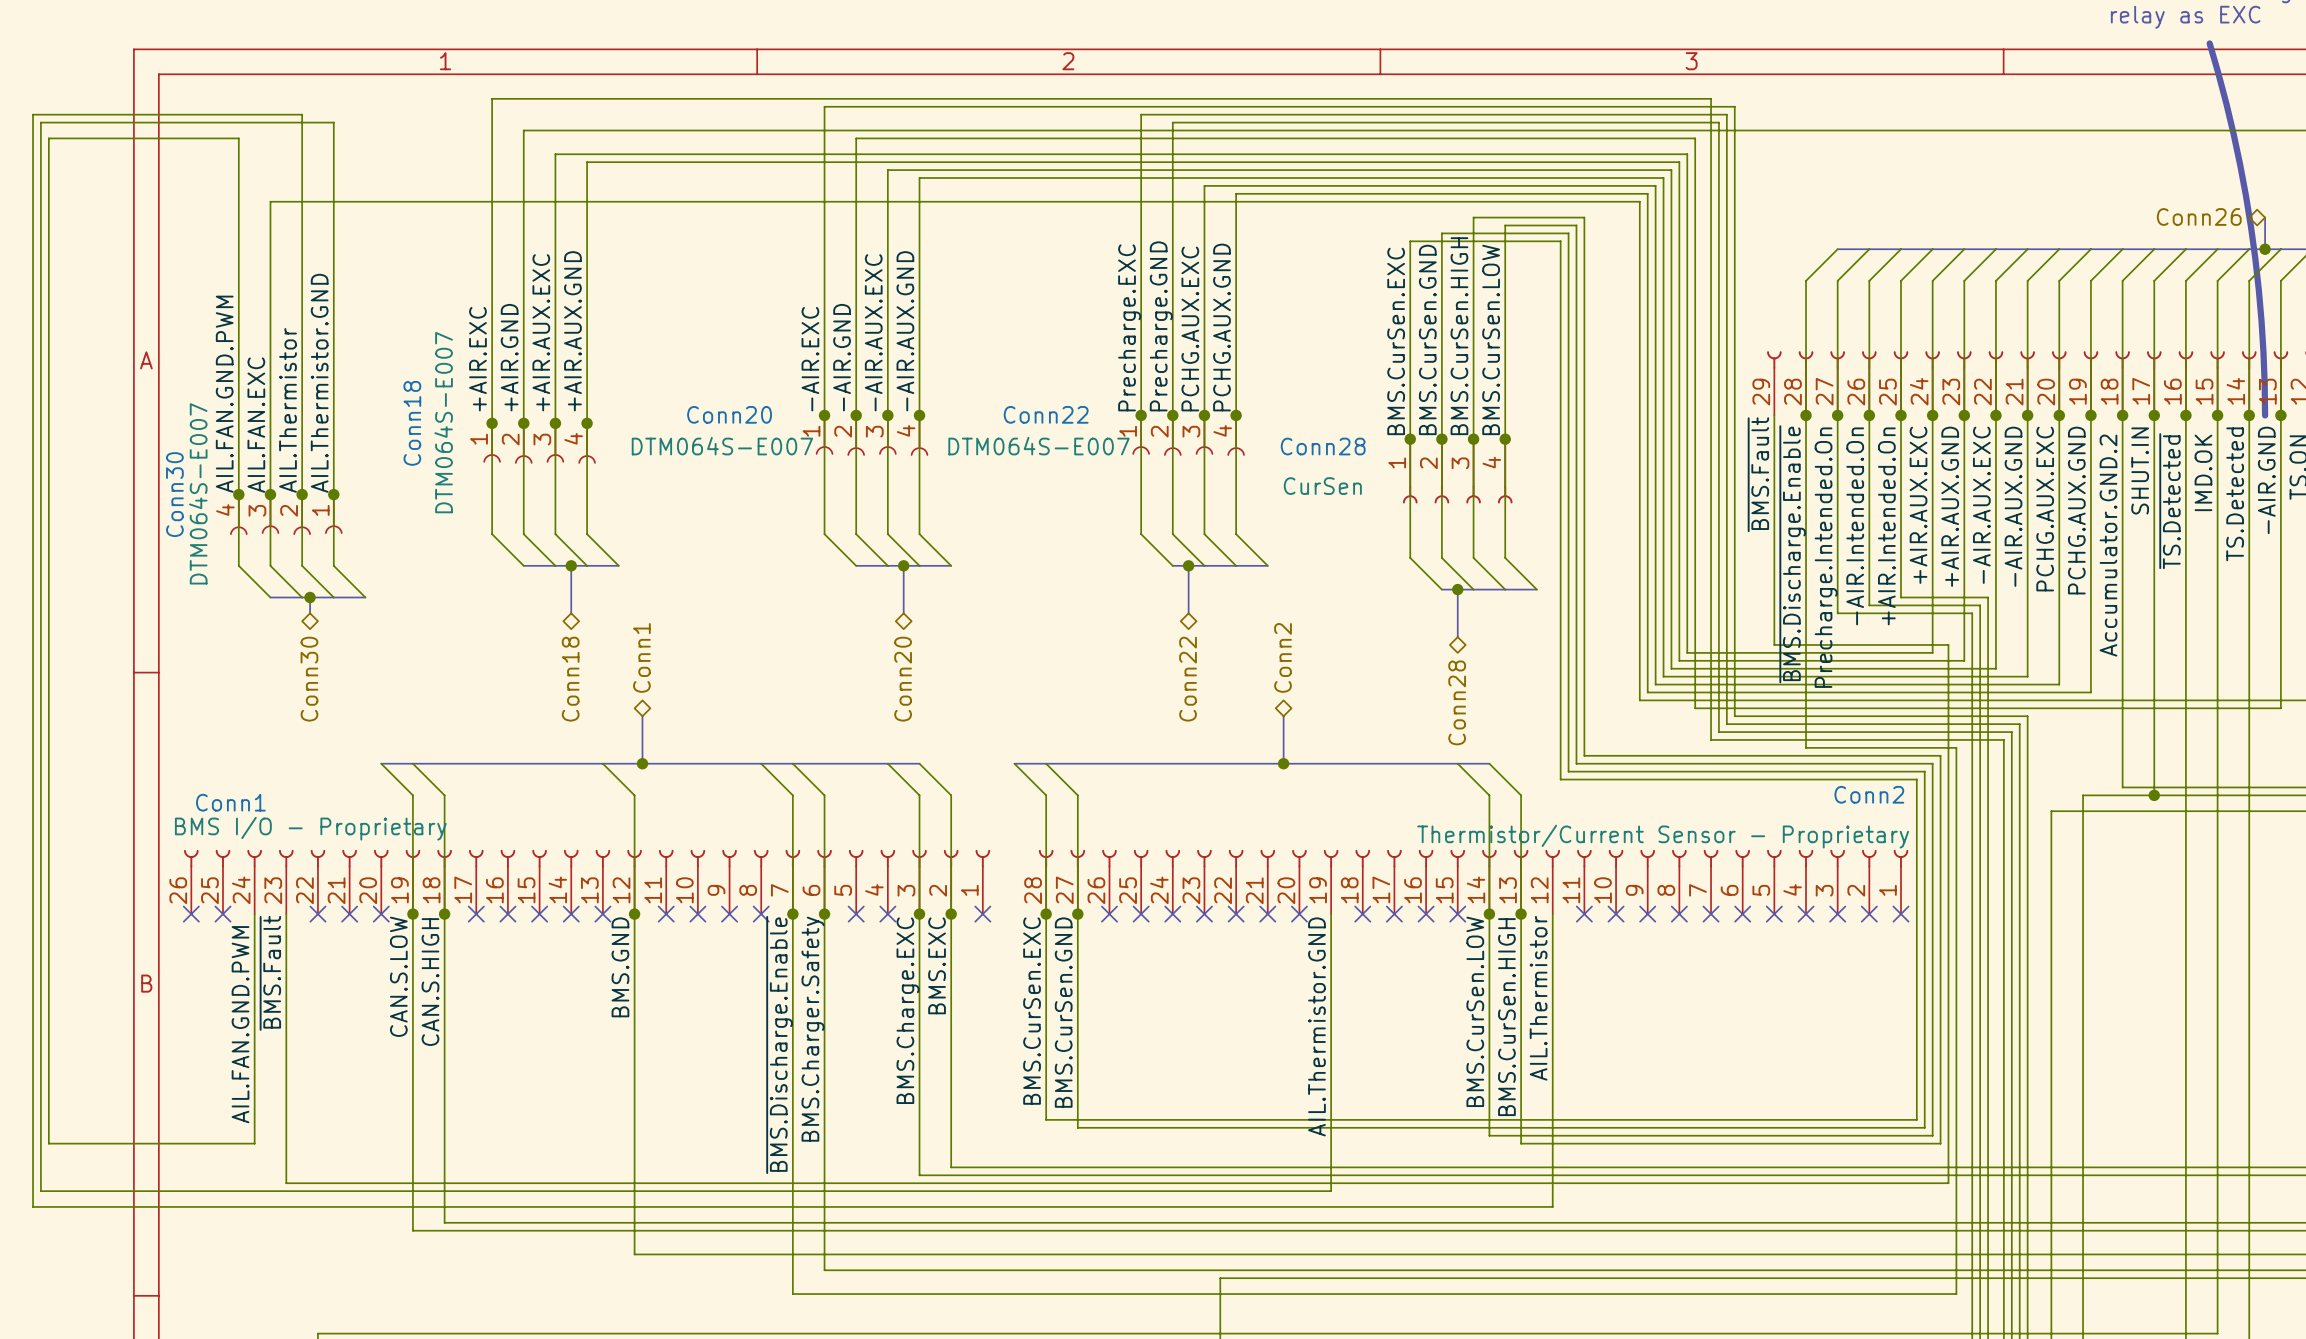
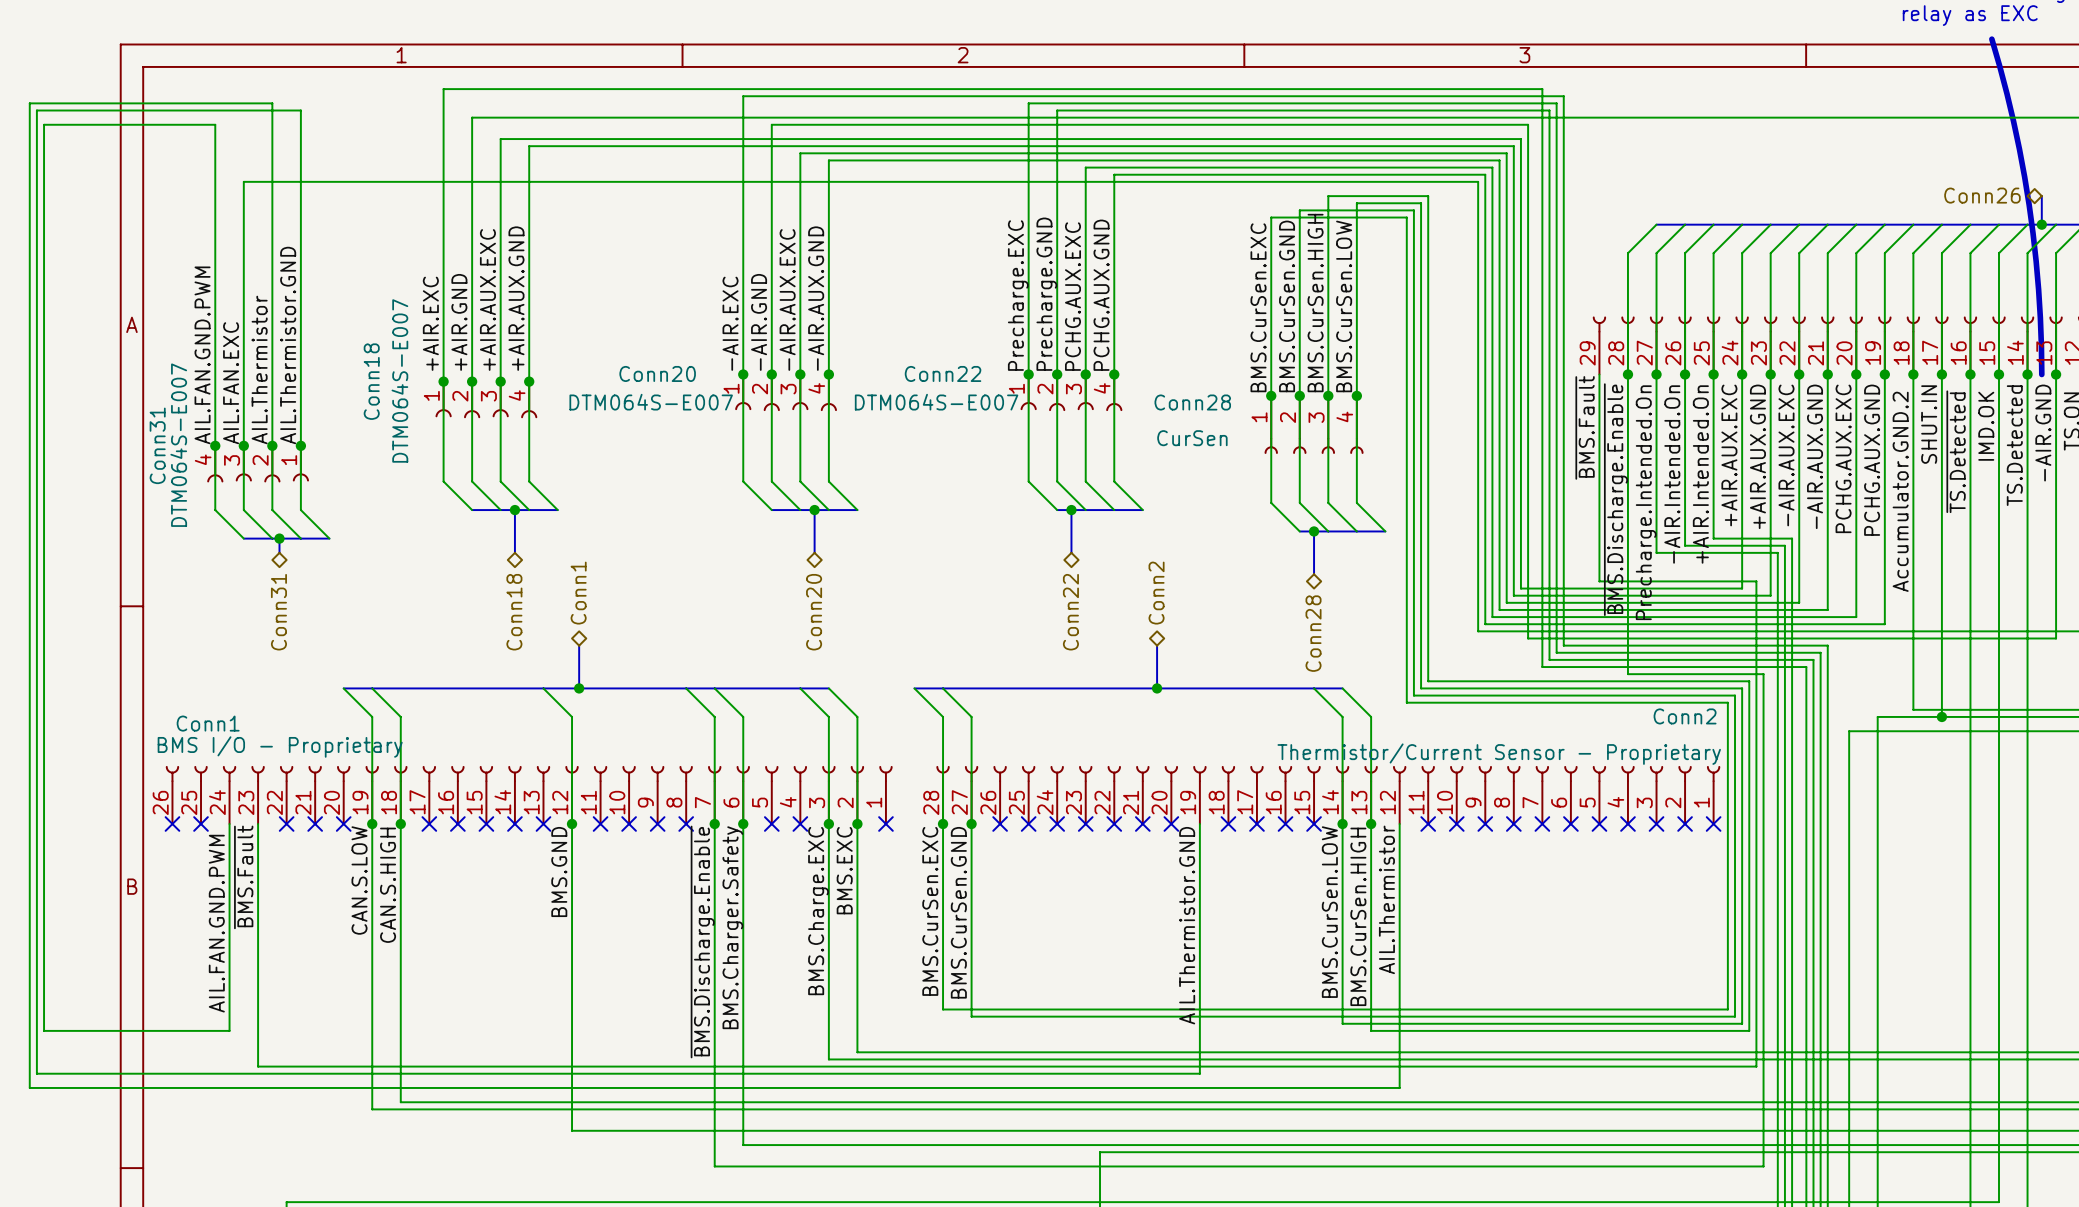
Conn30 name: Conn30 (174, 494) -> Conn31 (157, 445)
hierarchical label: Conn30 (309, 679) -> Conn31 (278, 612)

